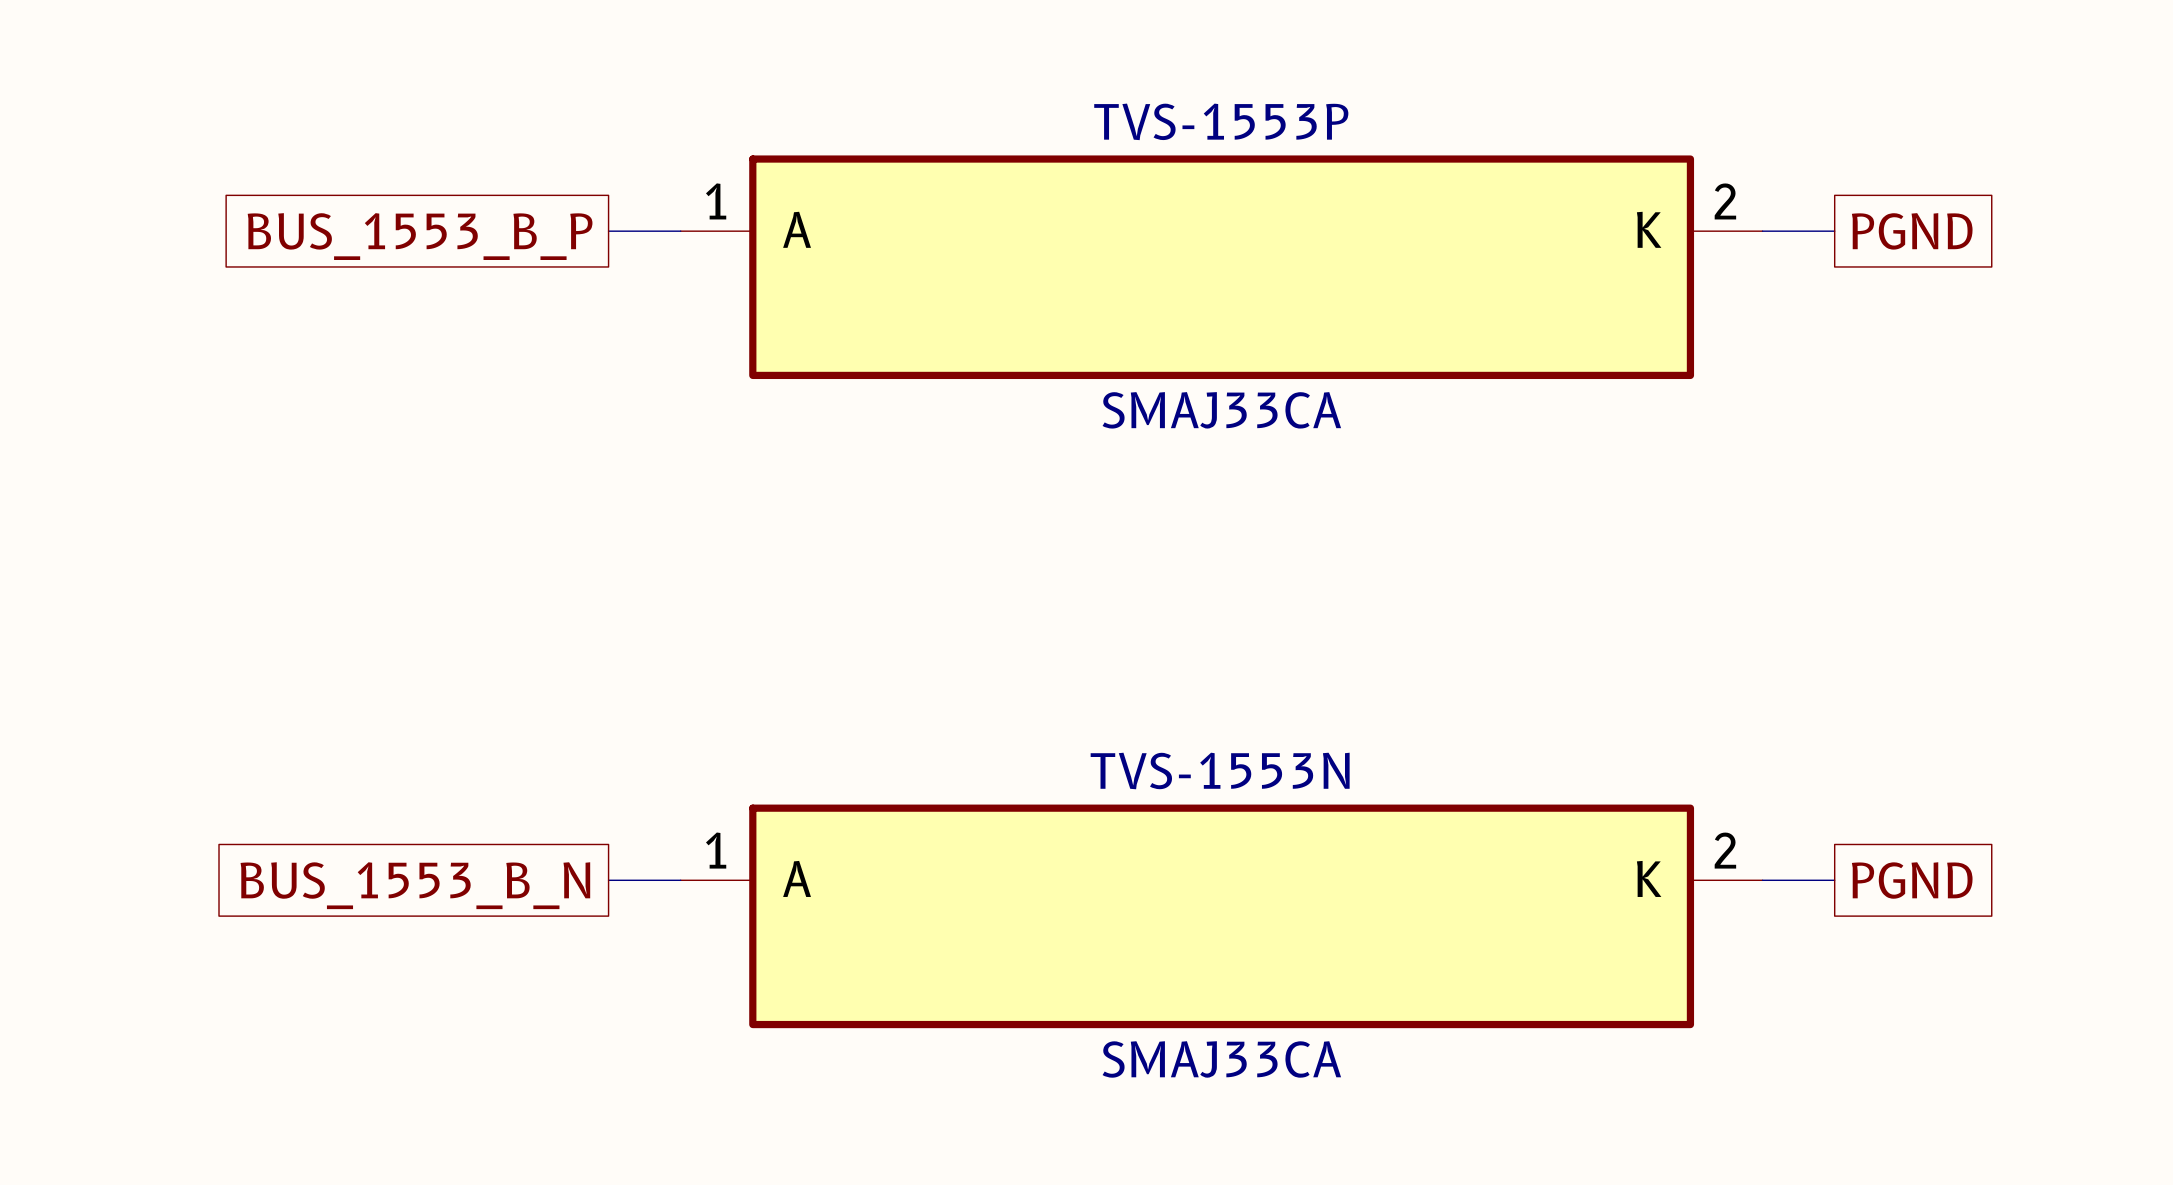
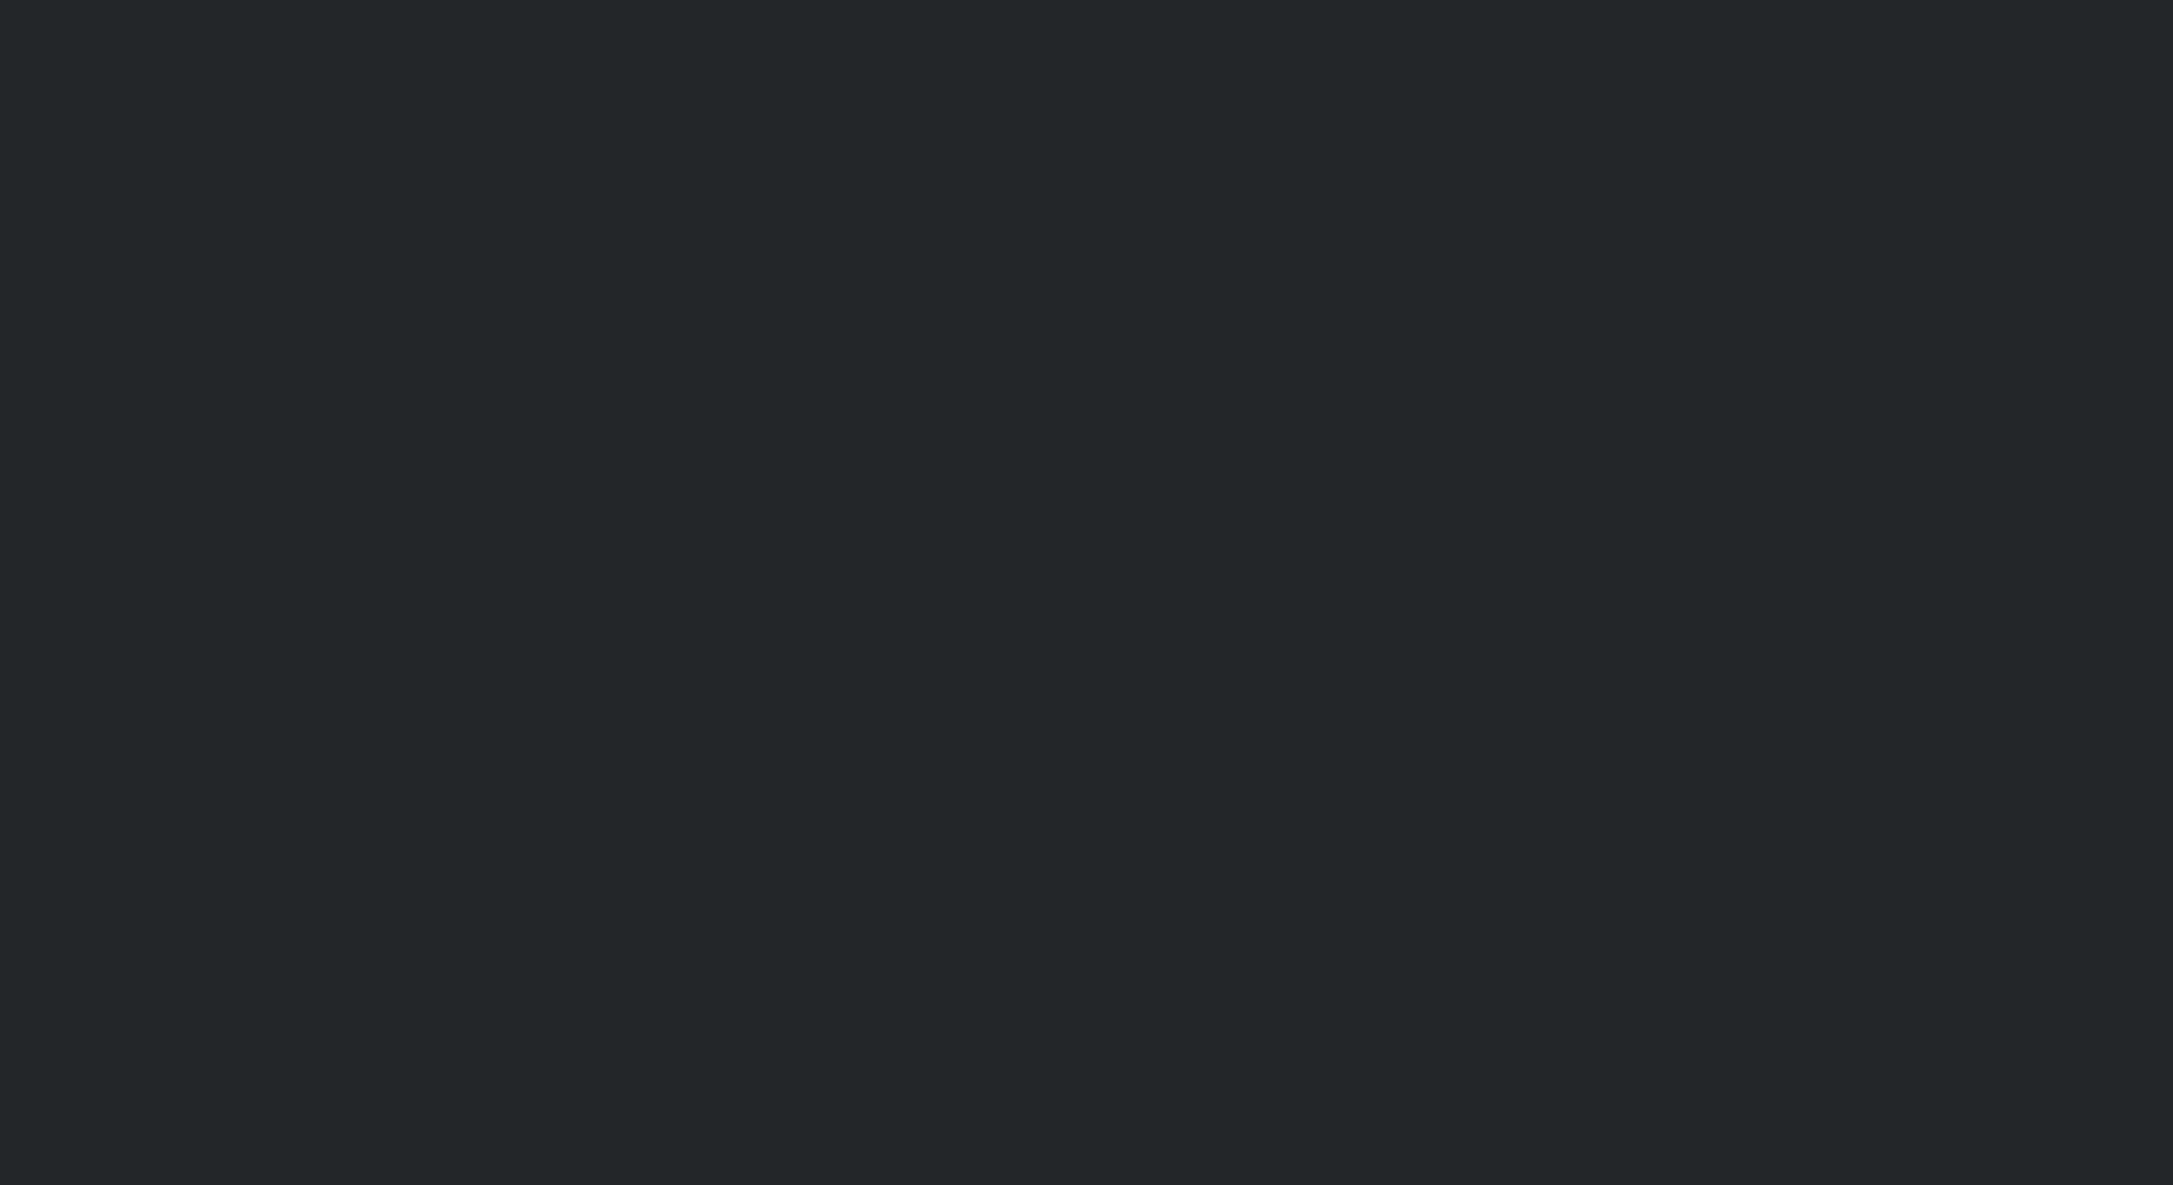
wire: (608, 231) (680, 231) -> none
wire: (1762, 231) (1834, 231) -> none
global label: PGND (1912, 231) -> none
global label: BUS_1553_B_P (420, 236) -> none
TVS-1553P: SMAJ33CA (1221, 267) -> none
wire: (608, 880) (680, 880) -> none
wire: (1762, 880) (1834, 880) -> none
global label: PGND (1912, 880) -> none
global label: BUS_1553_B_N (415, 885) -> none
TVS-1553N: SMAJ33CA (1221, 916) -> none

